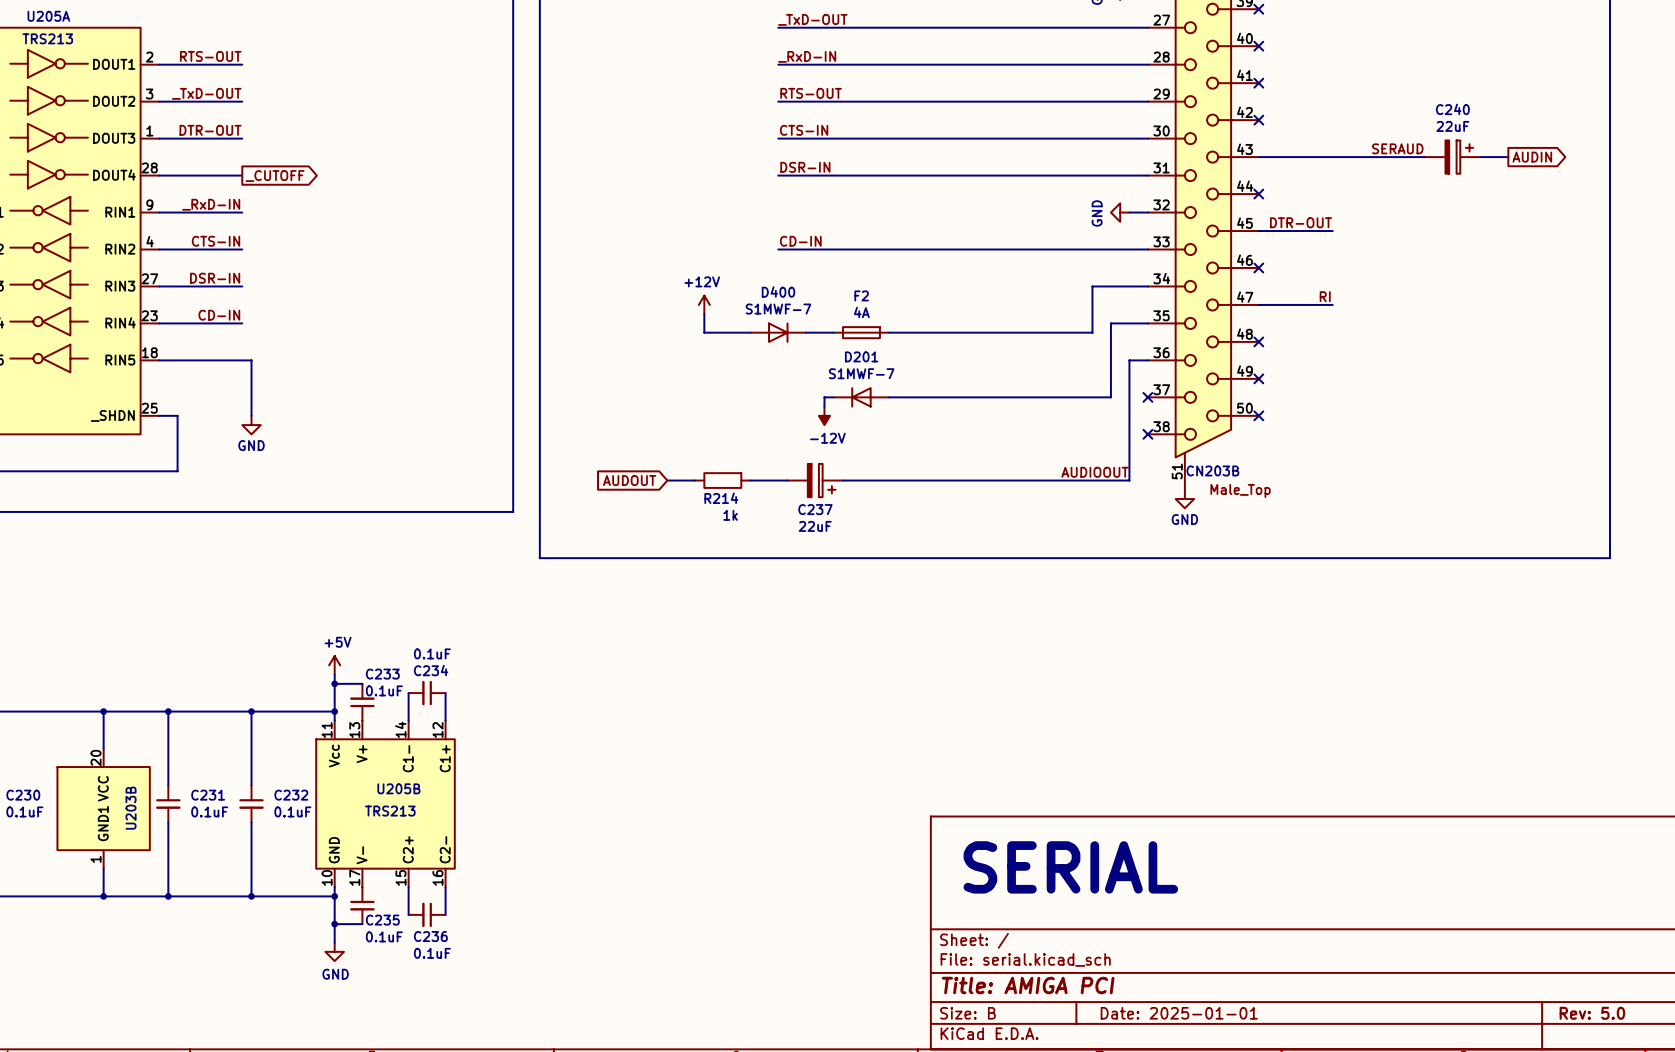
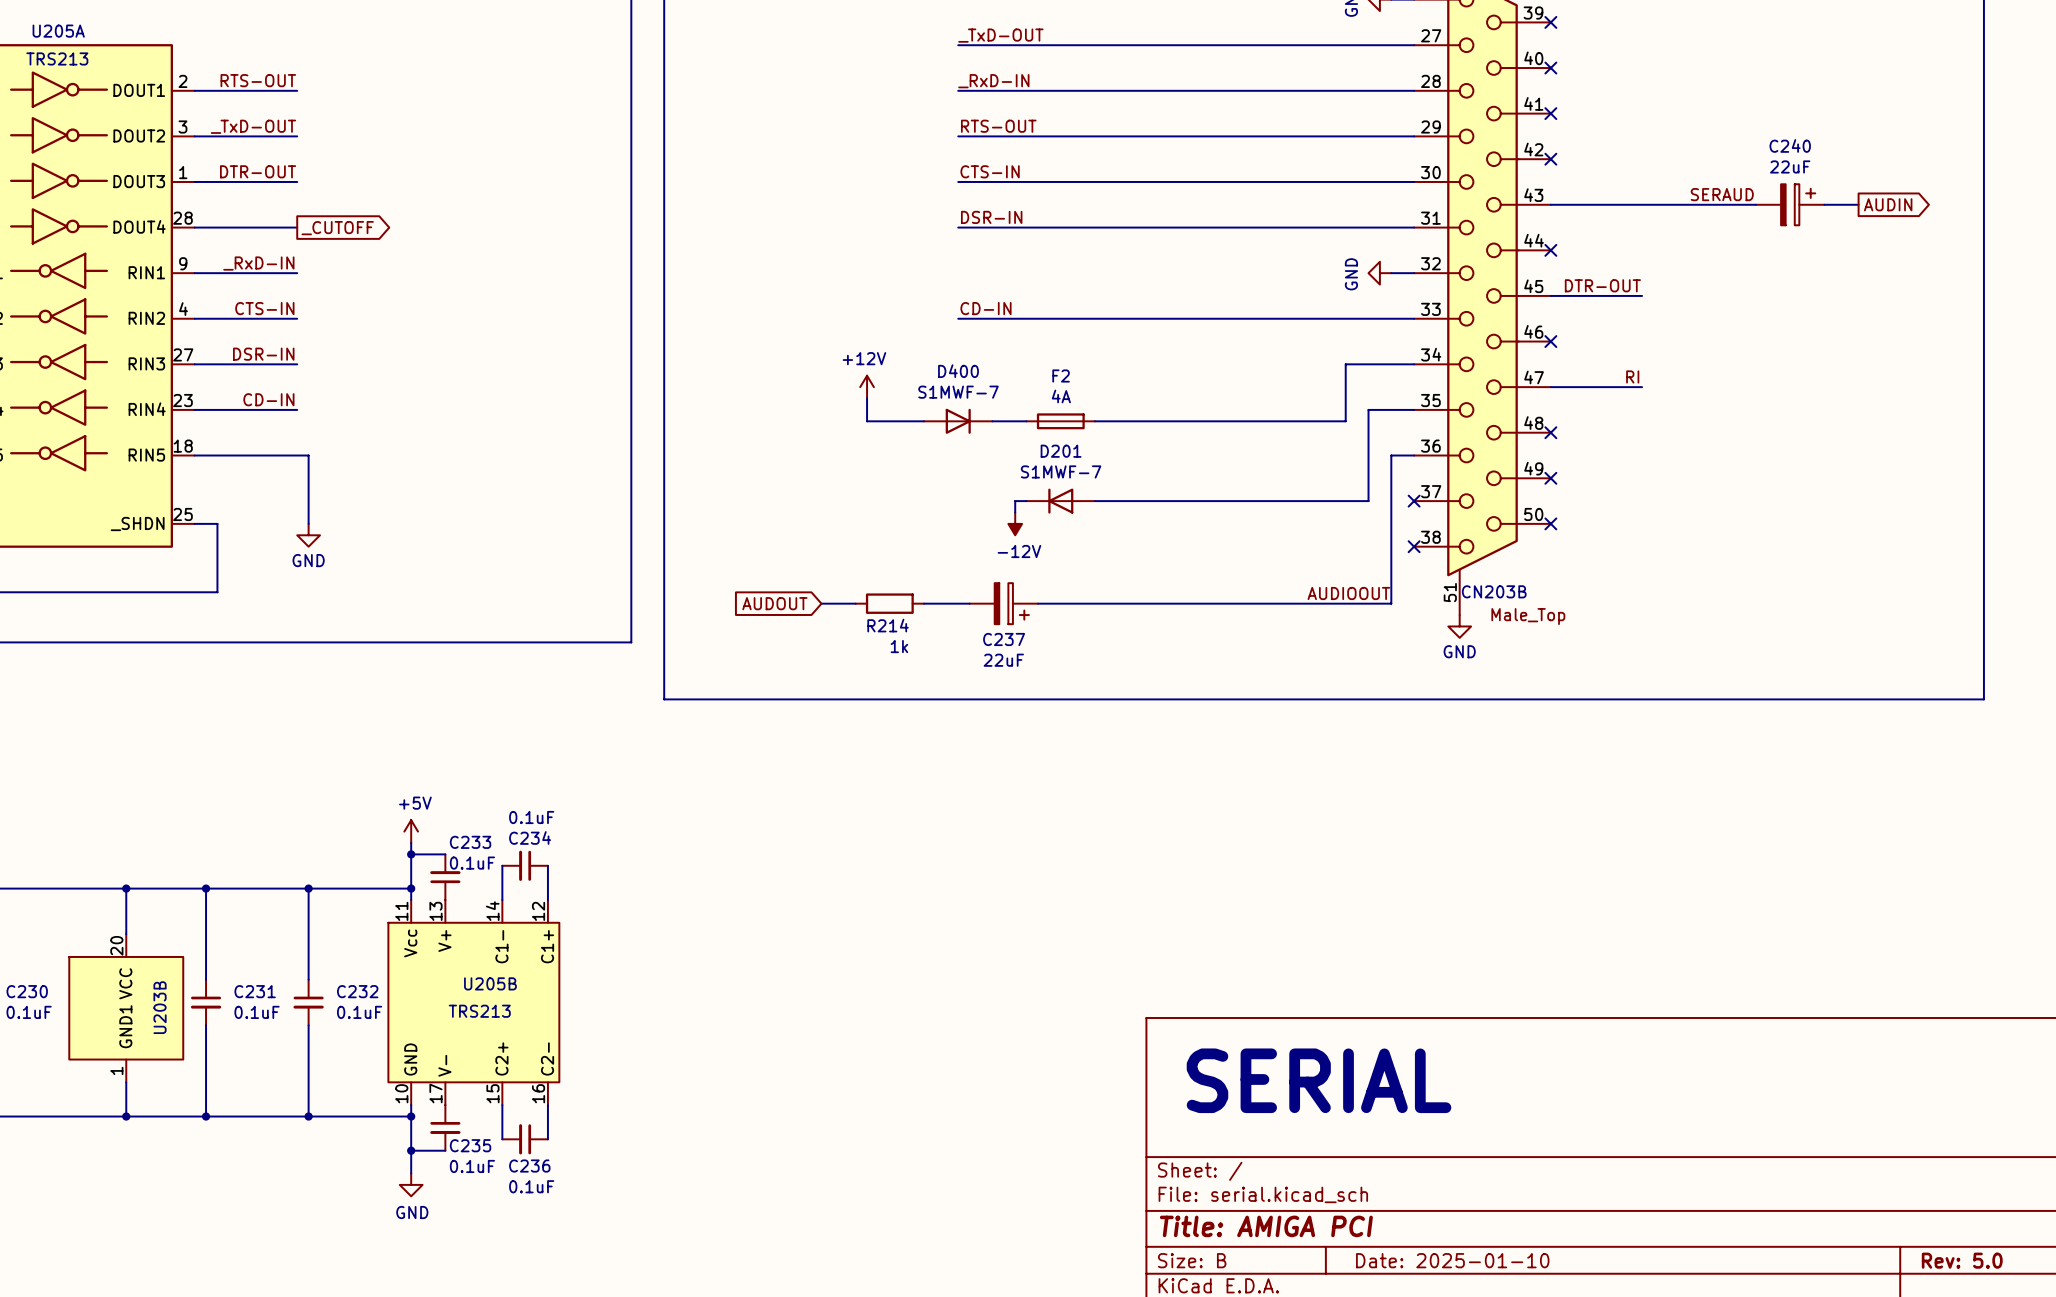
title block: Date: 2025-01-01 (1179, 1013) -> Date: 2025-01-10 (1452, 1260)

